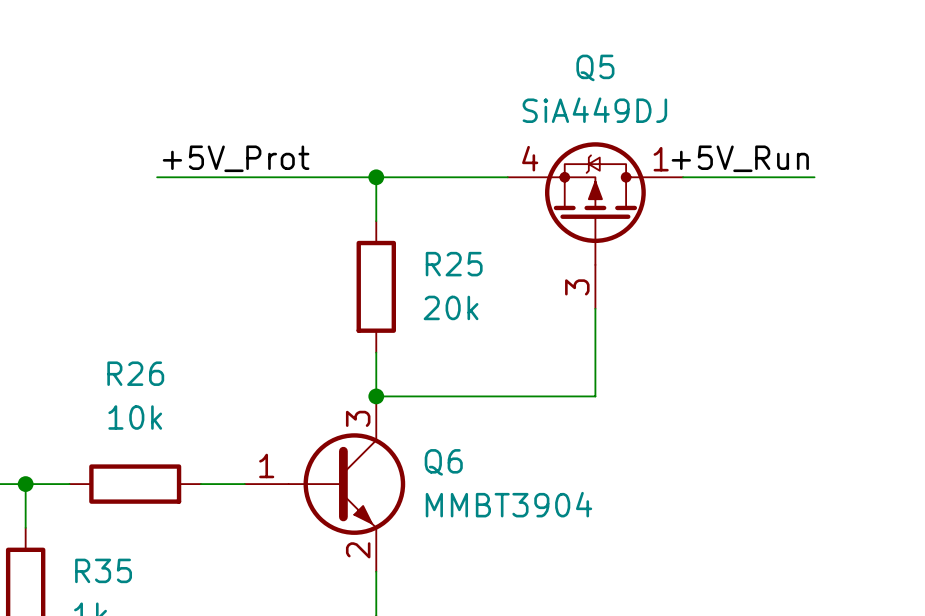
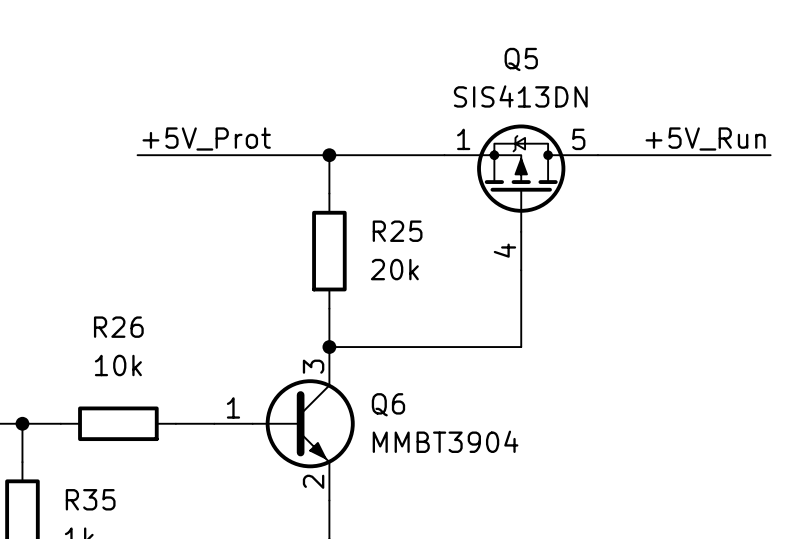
Q5 value: SiA449DJ (594, 110) -> SIS413DN (520, 96)
Q5 pin number: 4 (530, 158) -> 1 (463, 139)
label position: +5V_Run (740, 158) -> +5V_Run (705, 138)
Q5 pin number: 1 (661, 159) -> 5 (578, 139)
wire: none -> (713, 155) (770, 155)
Q5 pin number: 3 (577, 287) -> 4 (504, 250)

